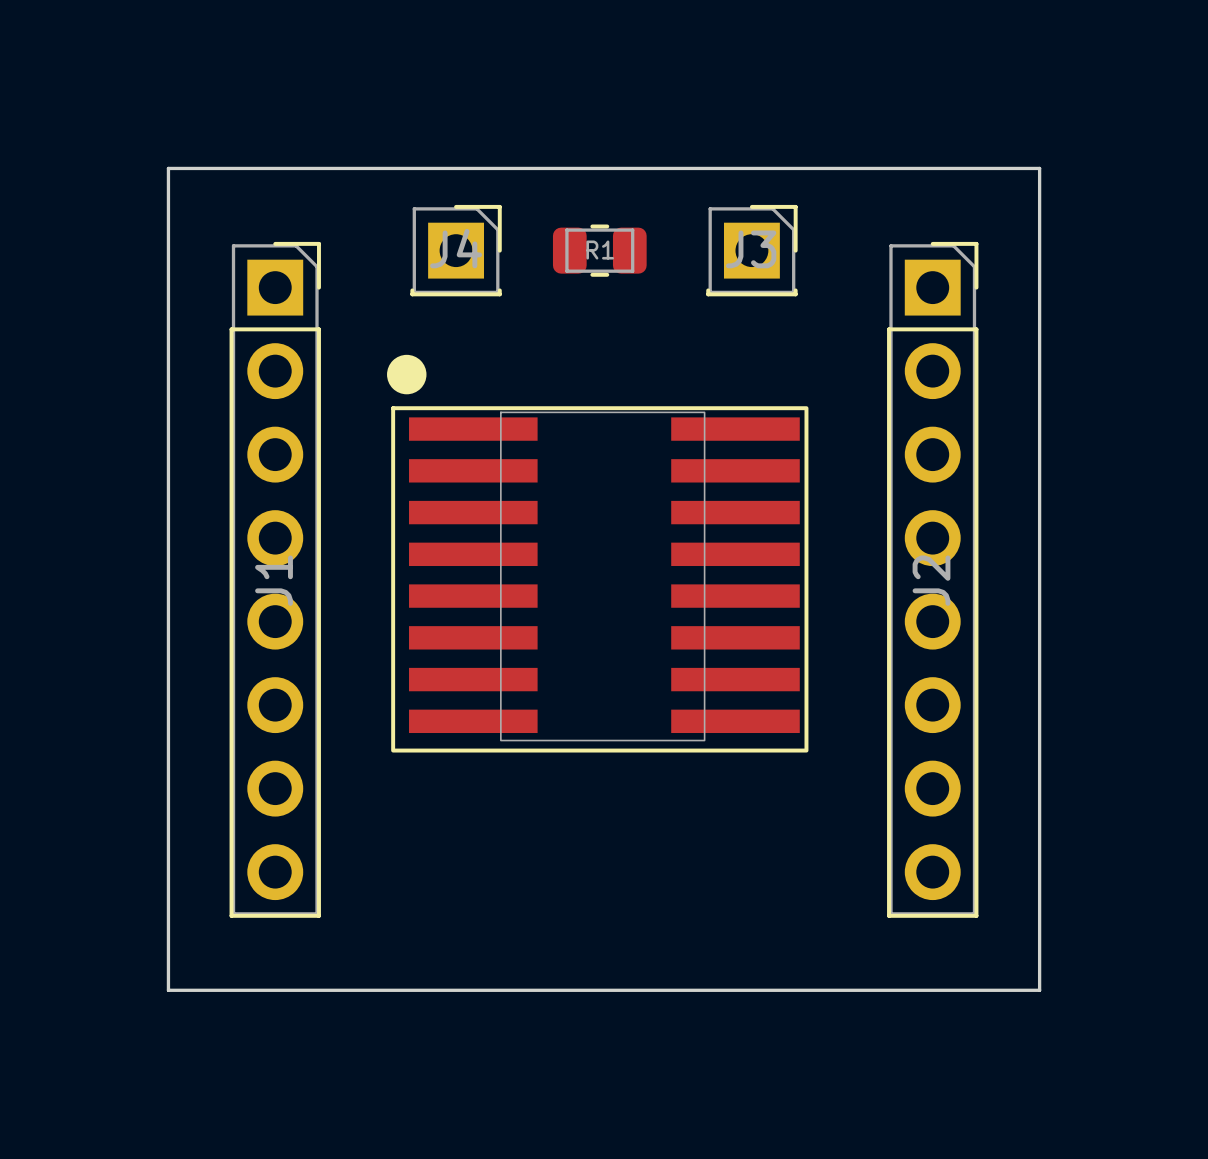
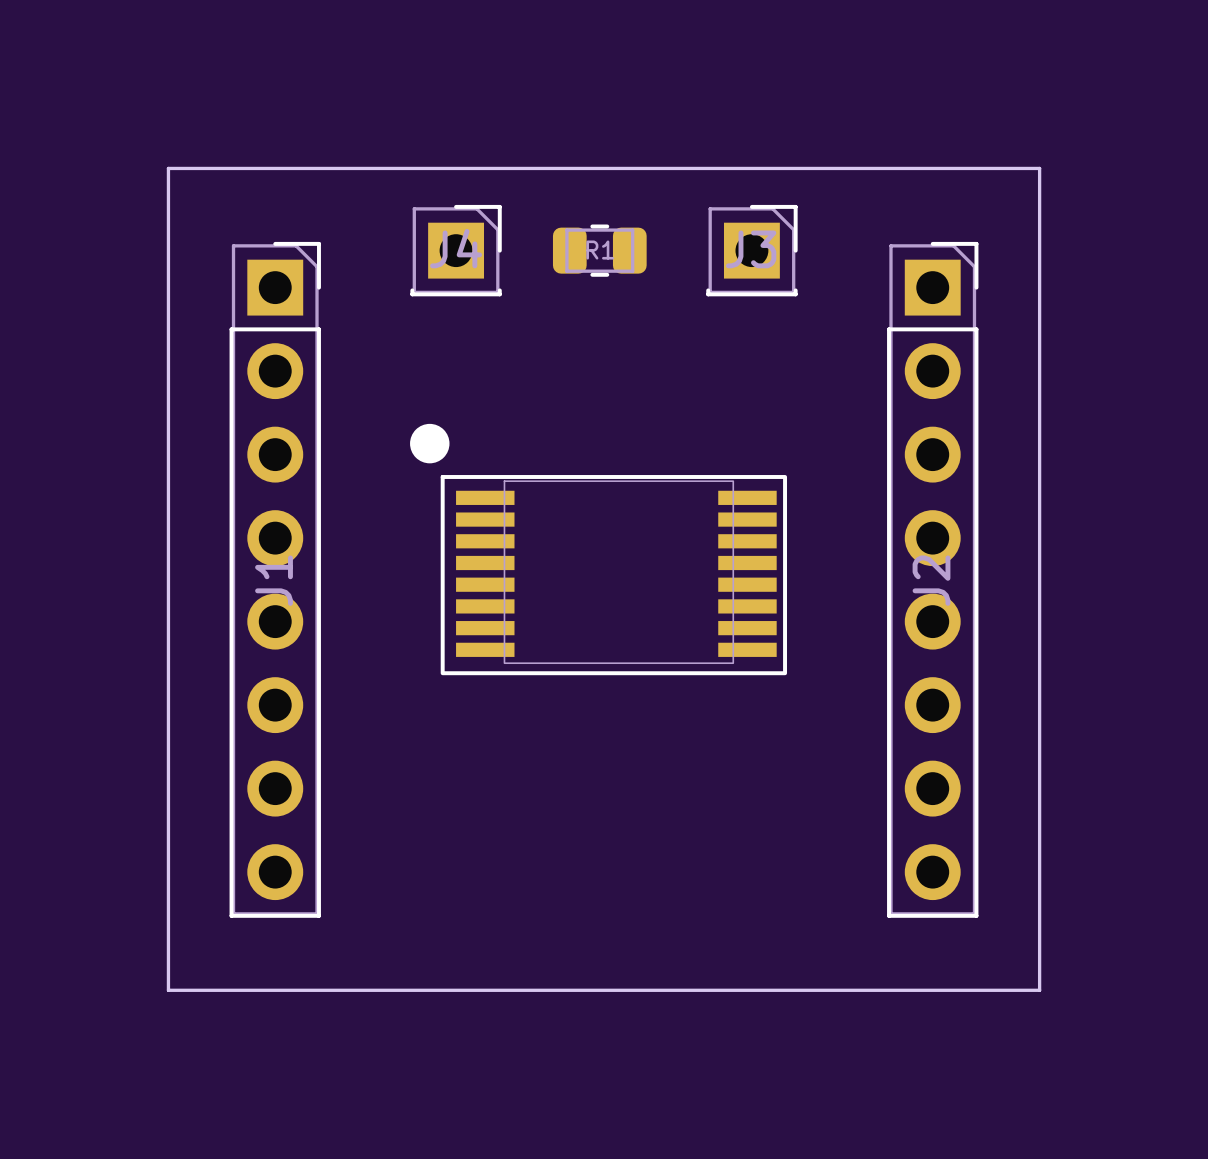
drawing position: (406, 374) -> (429, 443)
part footprint: [391, 406, 809, 753] -> [440, 475, 788, 676]

